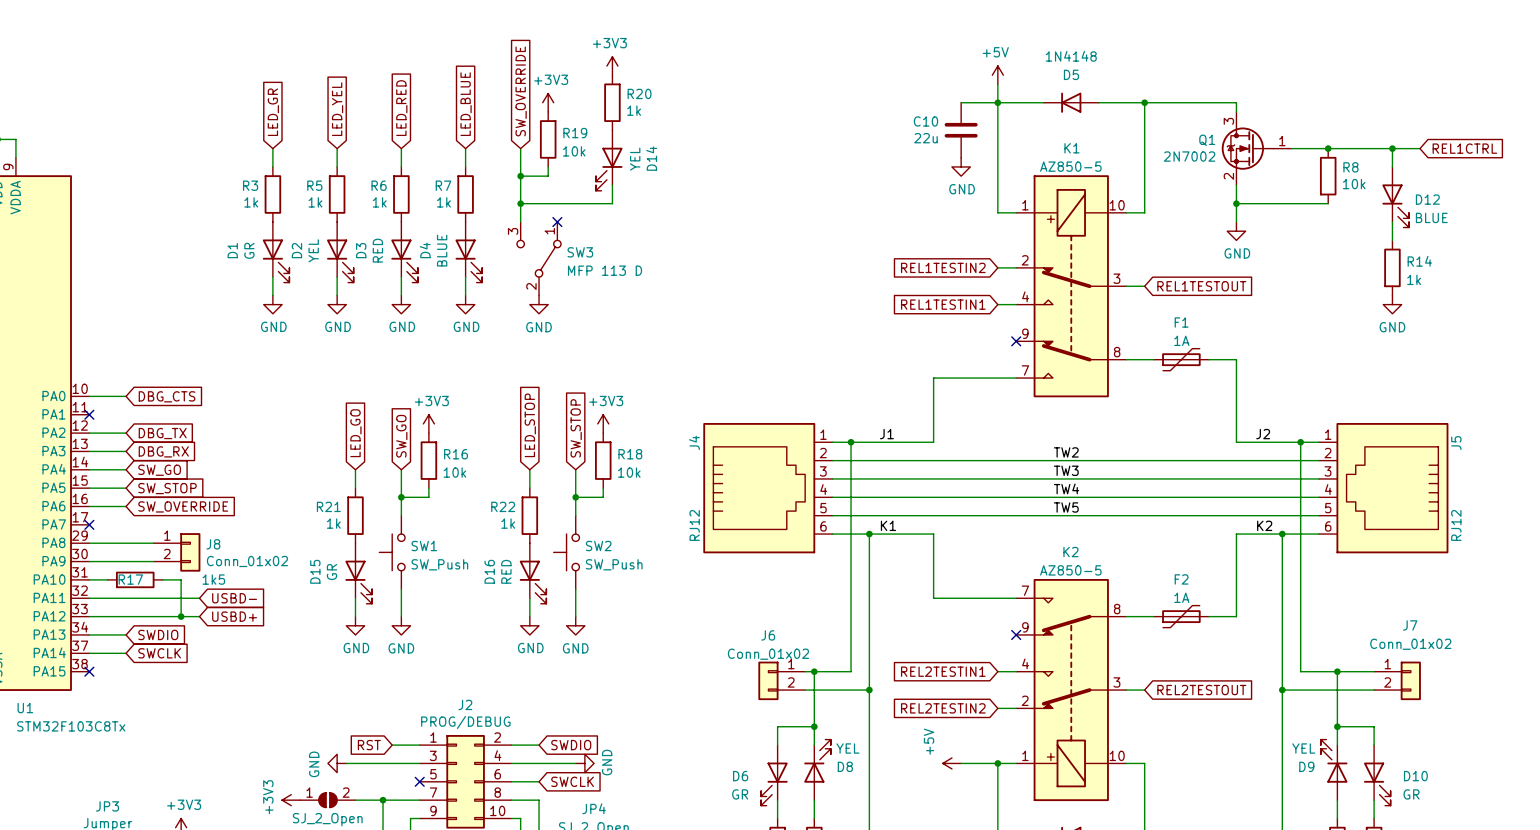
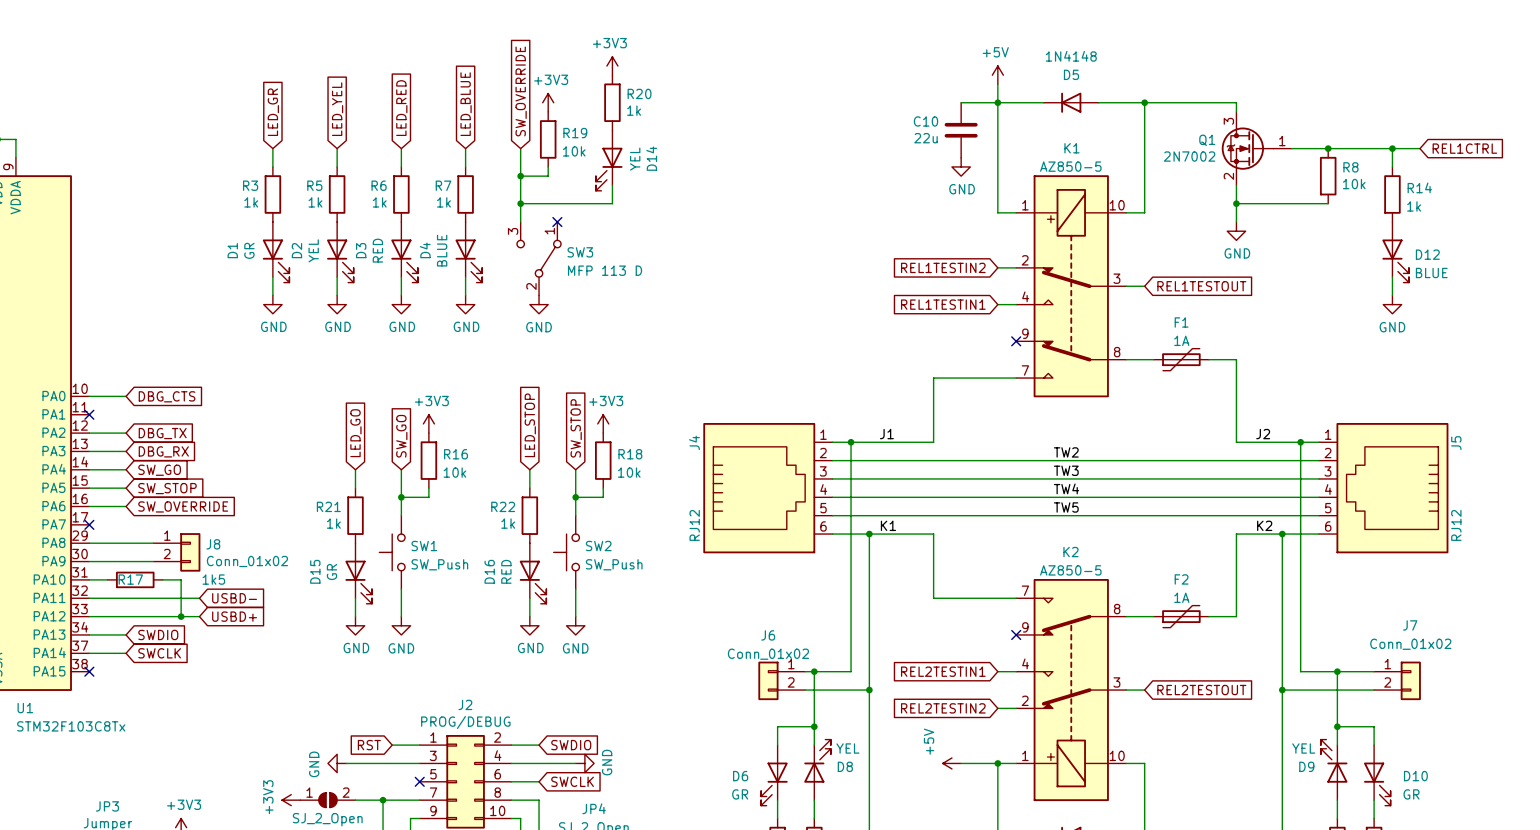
D12 position: (1395, 197) -> (1395, 252)
R14 position: (1392, 267) -> (1392, 194)

